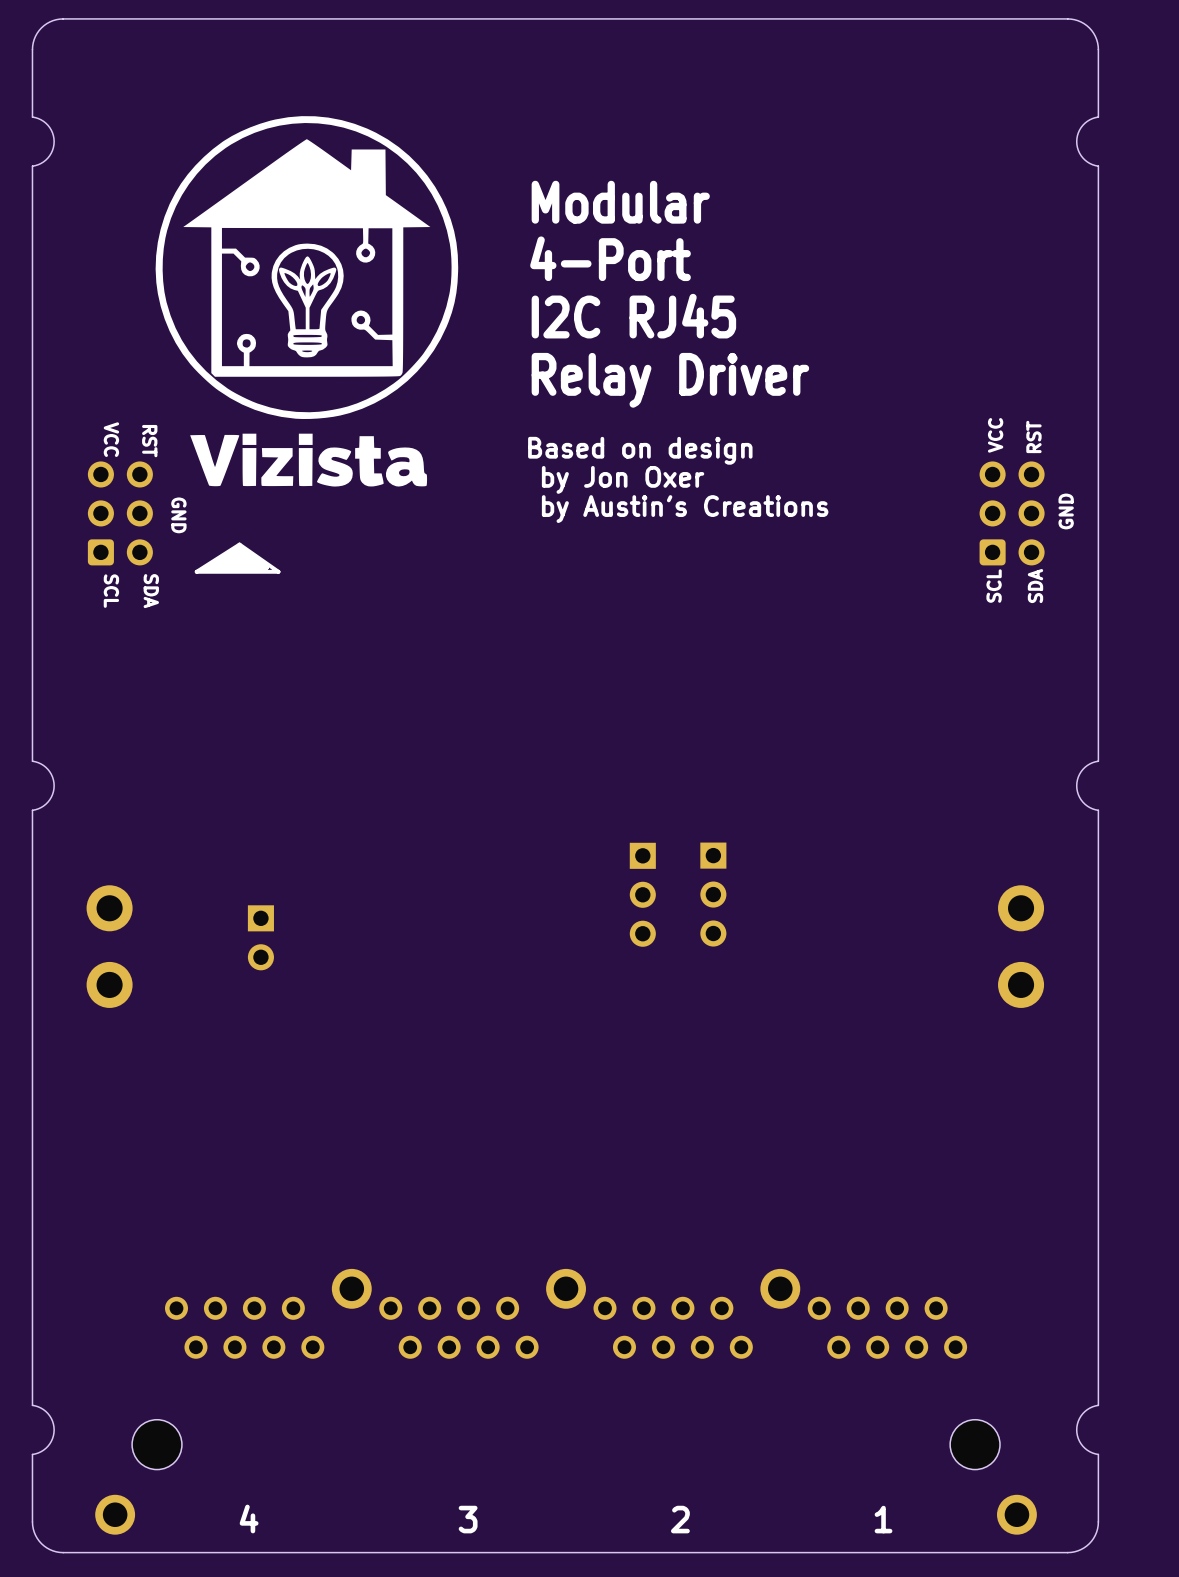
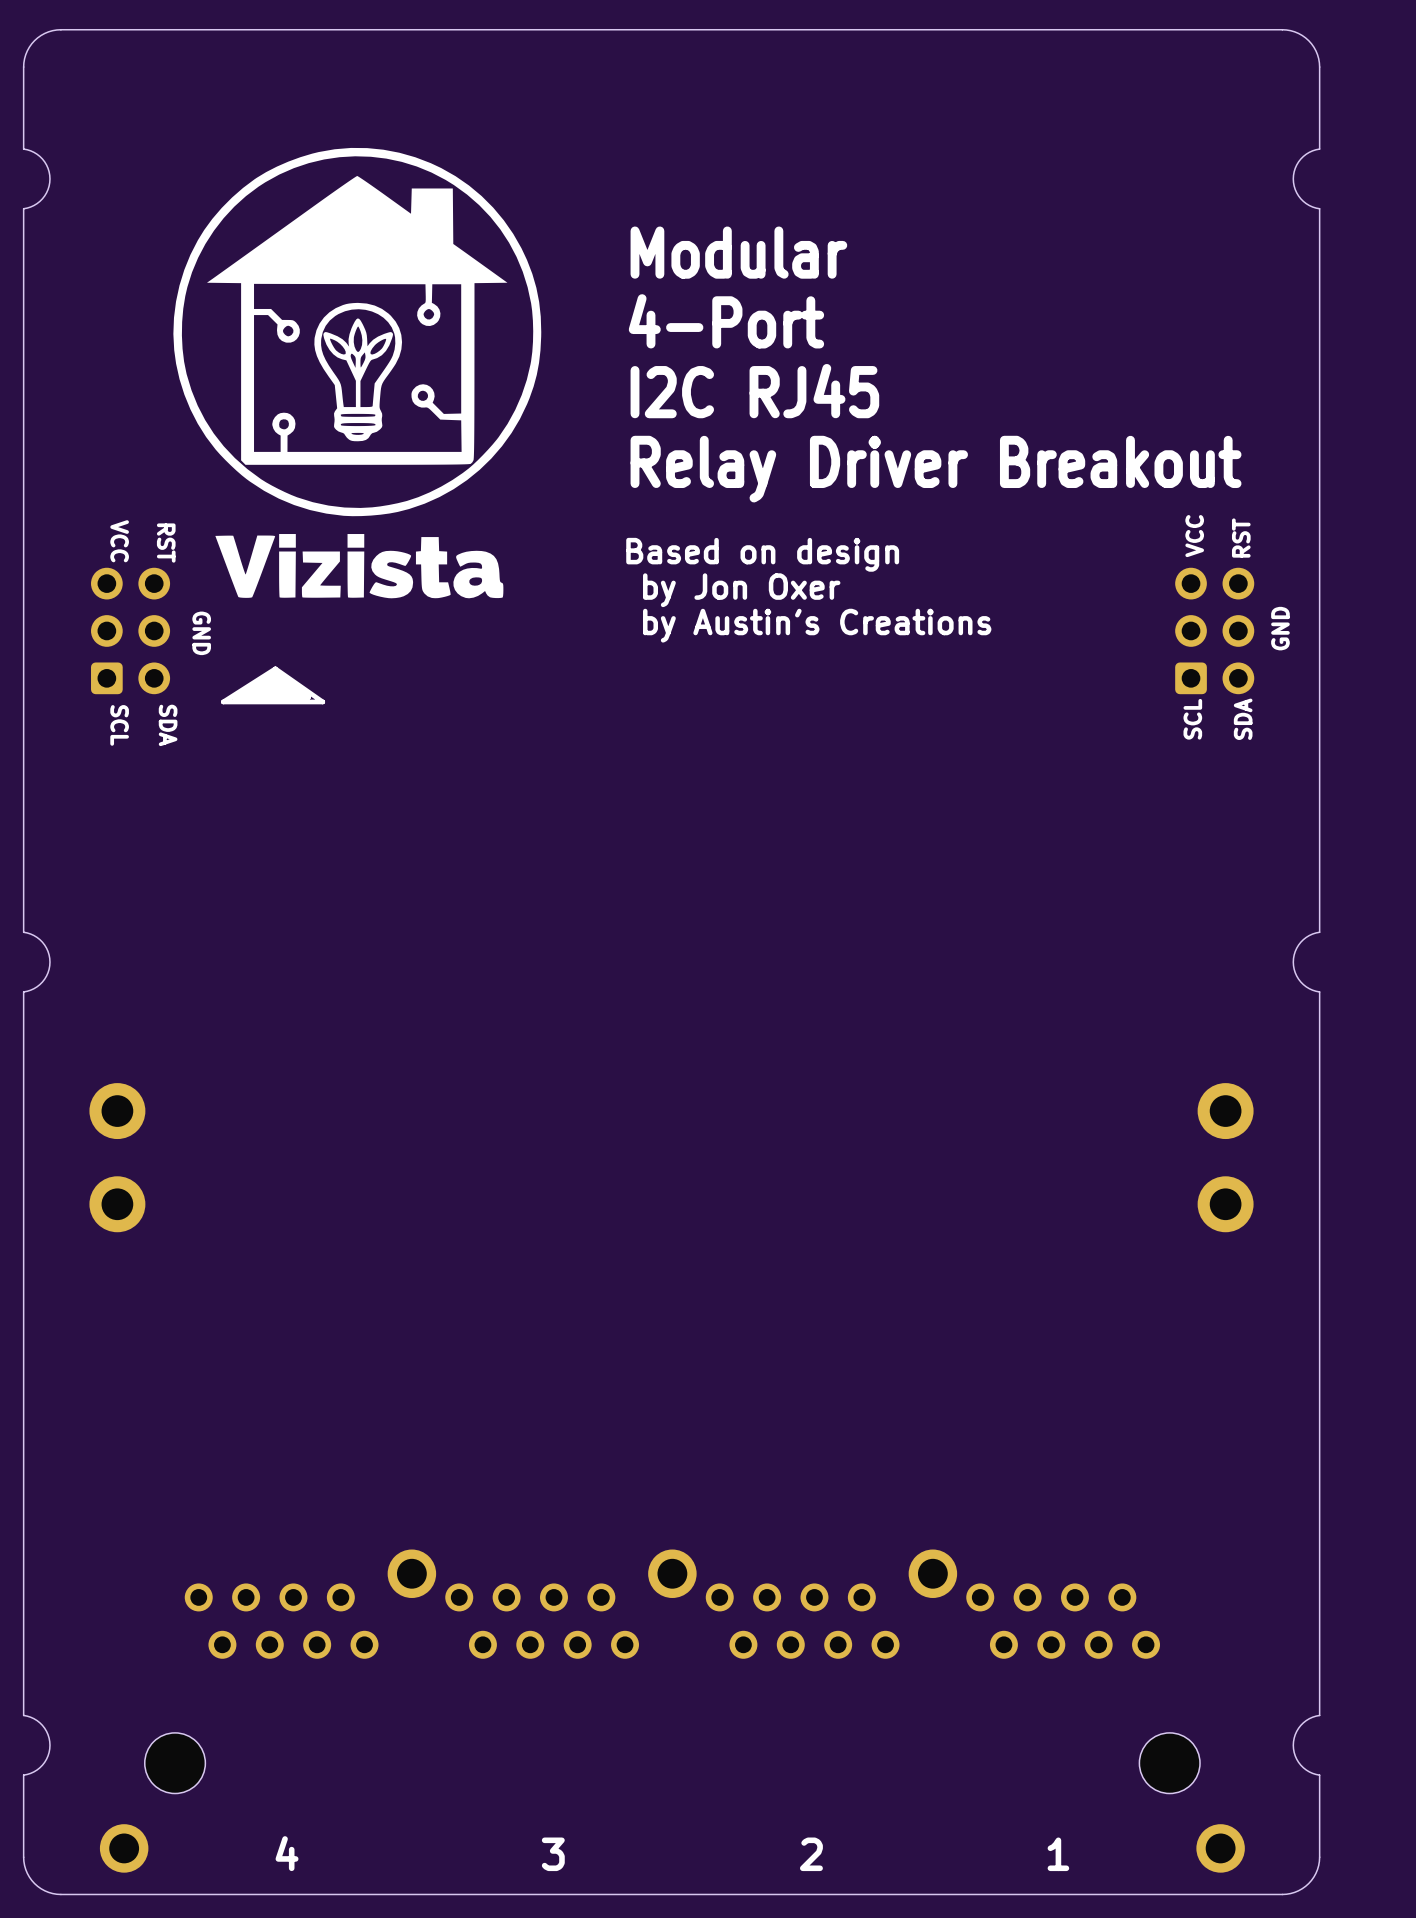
text: Relay Driver (670, 380) -> Relay Driver Breakout (936, 469)
part: (642, 894) -> none
part: (713, 894) -> none
part: (260, 937) -> none

